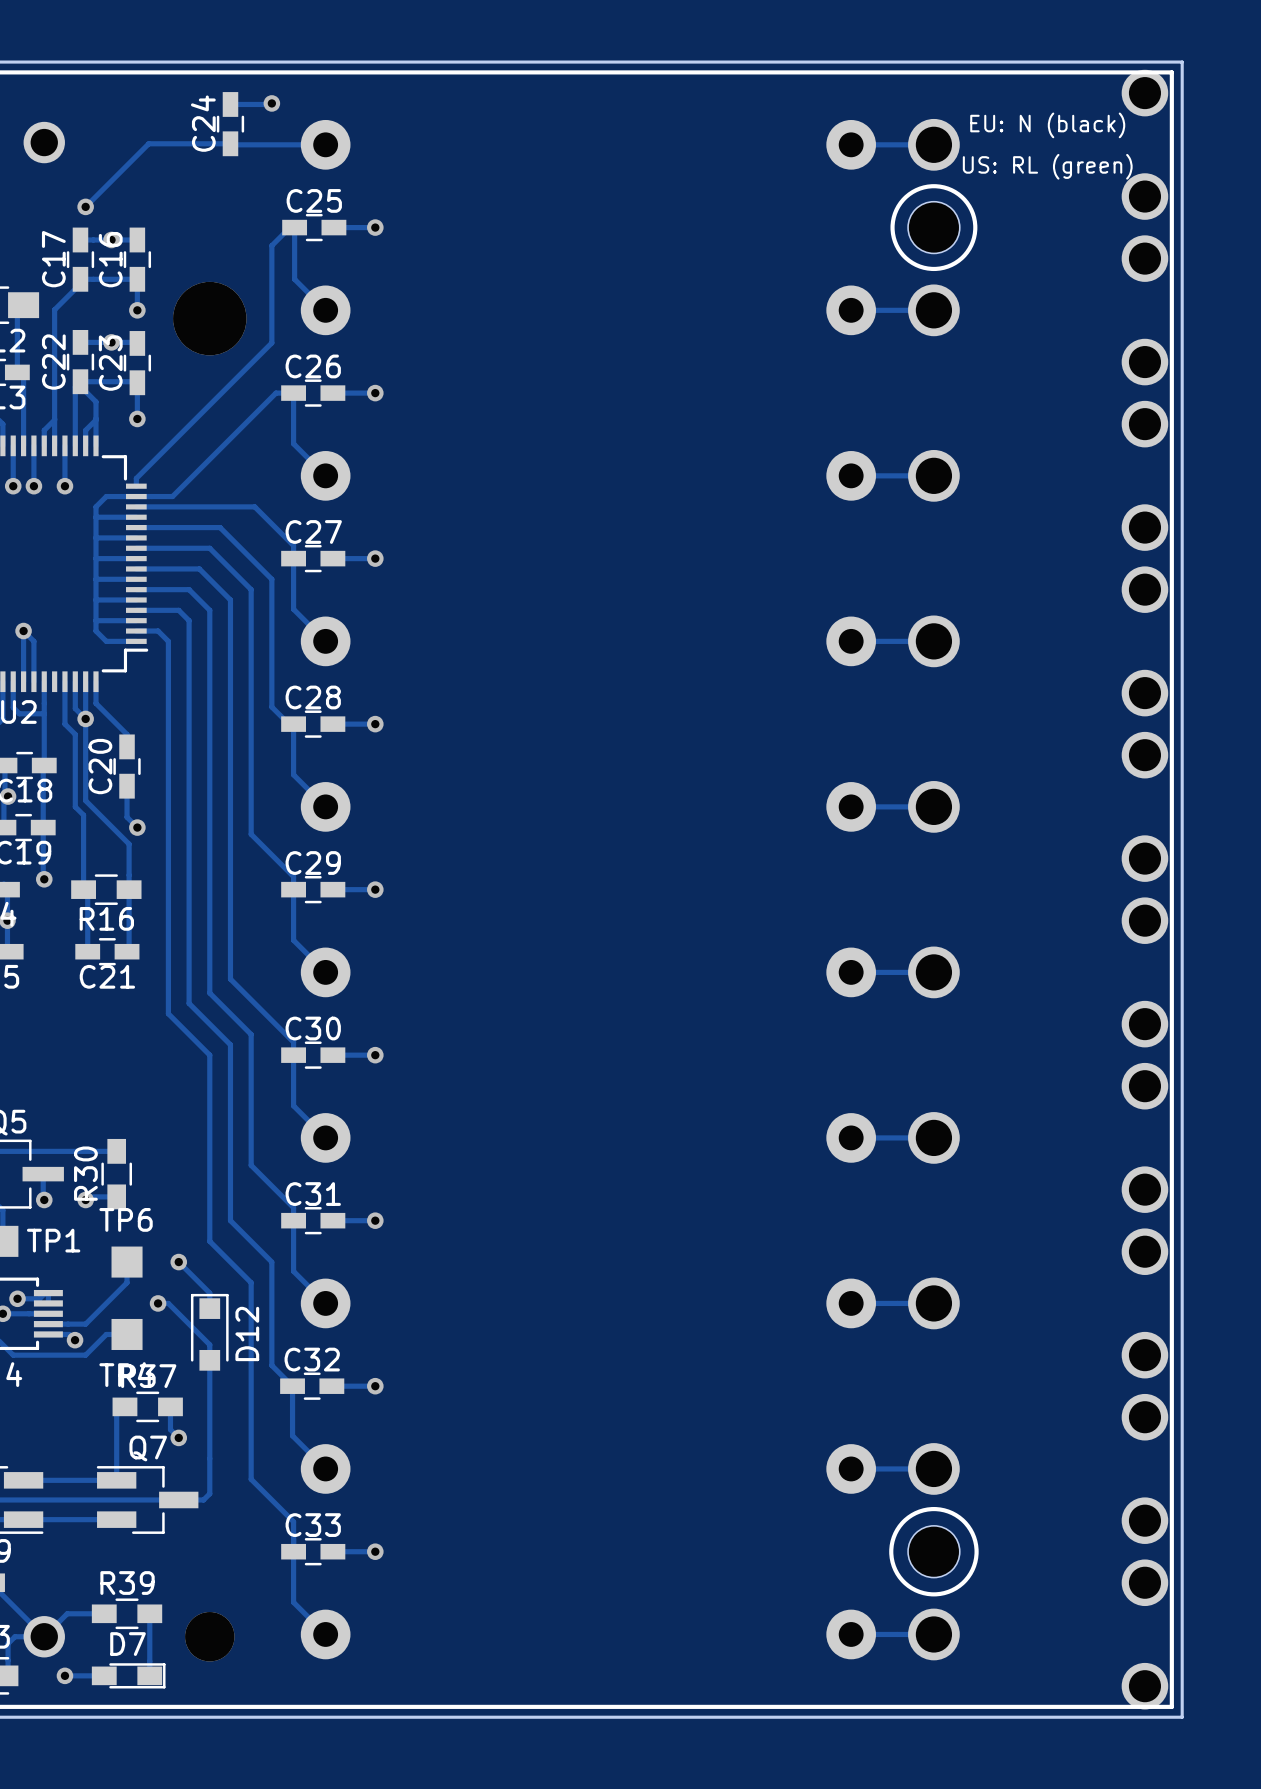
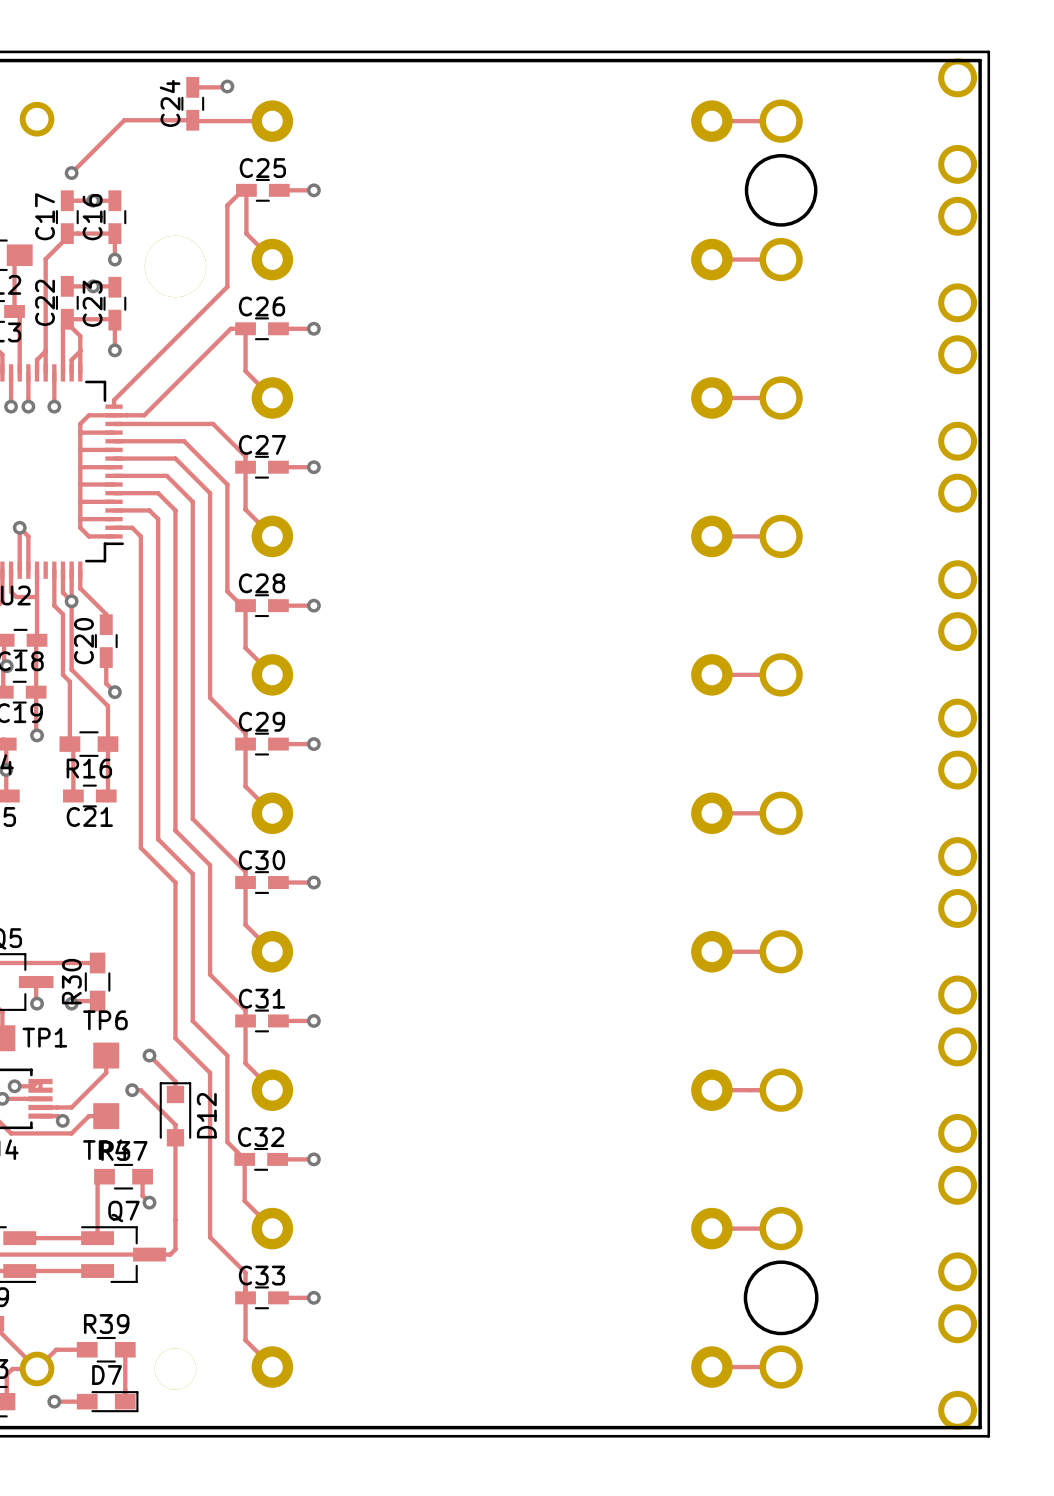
text: EU: N (black) (1047, 125) -> none
text: US: RL (green) (1047, 166) -> none
part: (933, 227) -> none
part: (933, 1551) -> none

